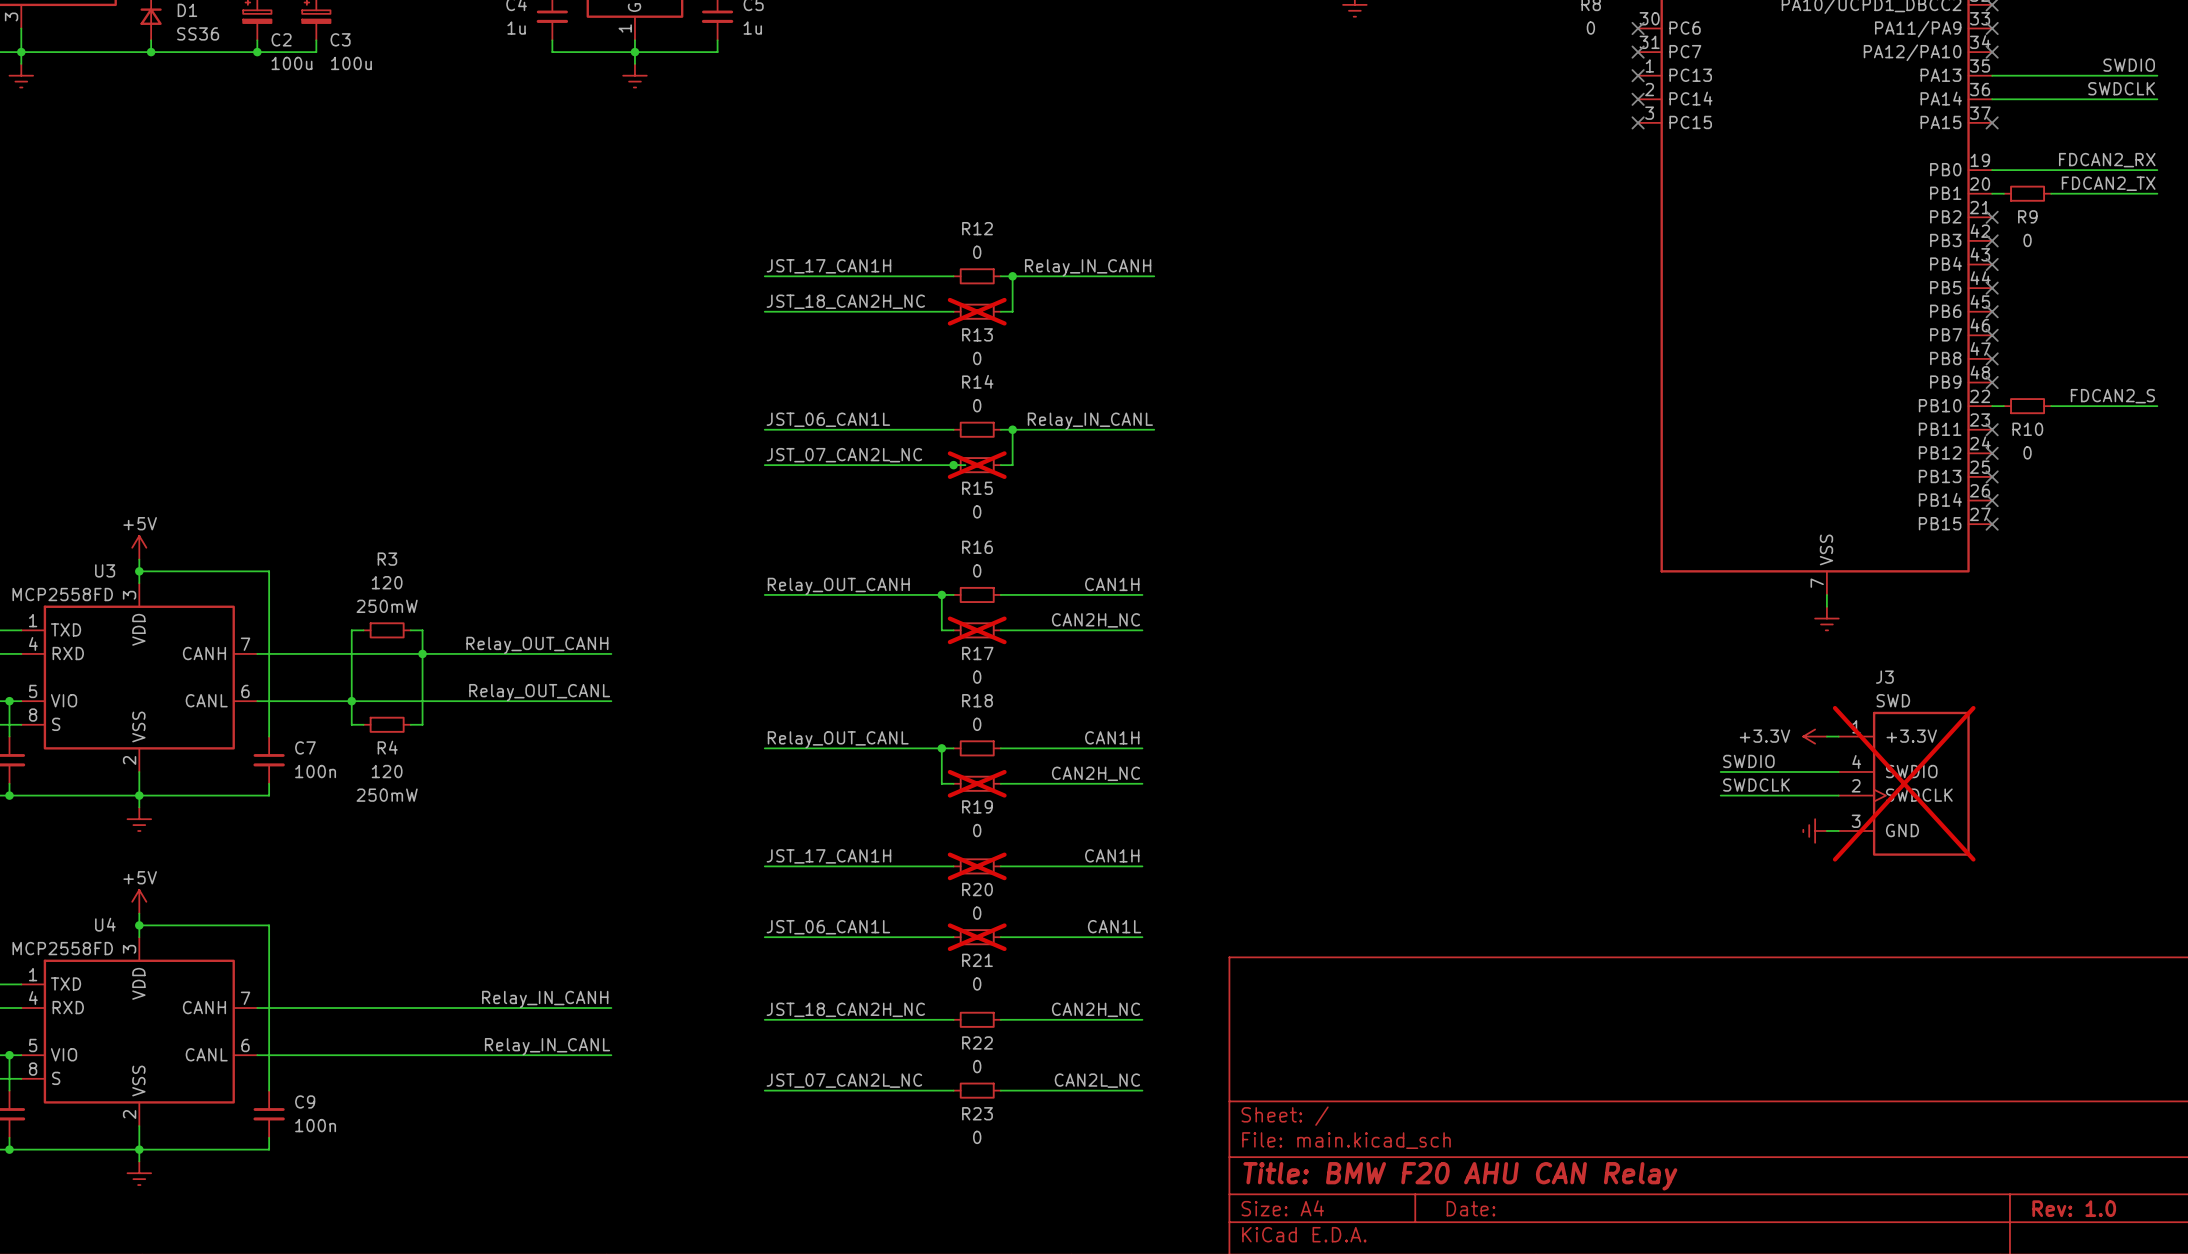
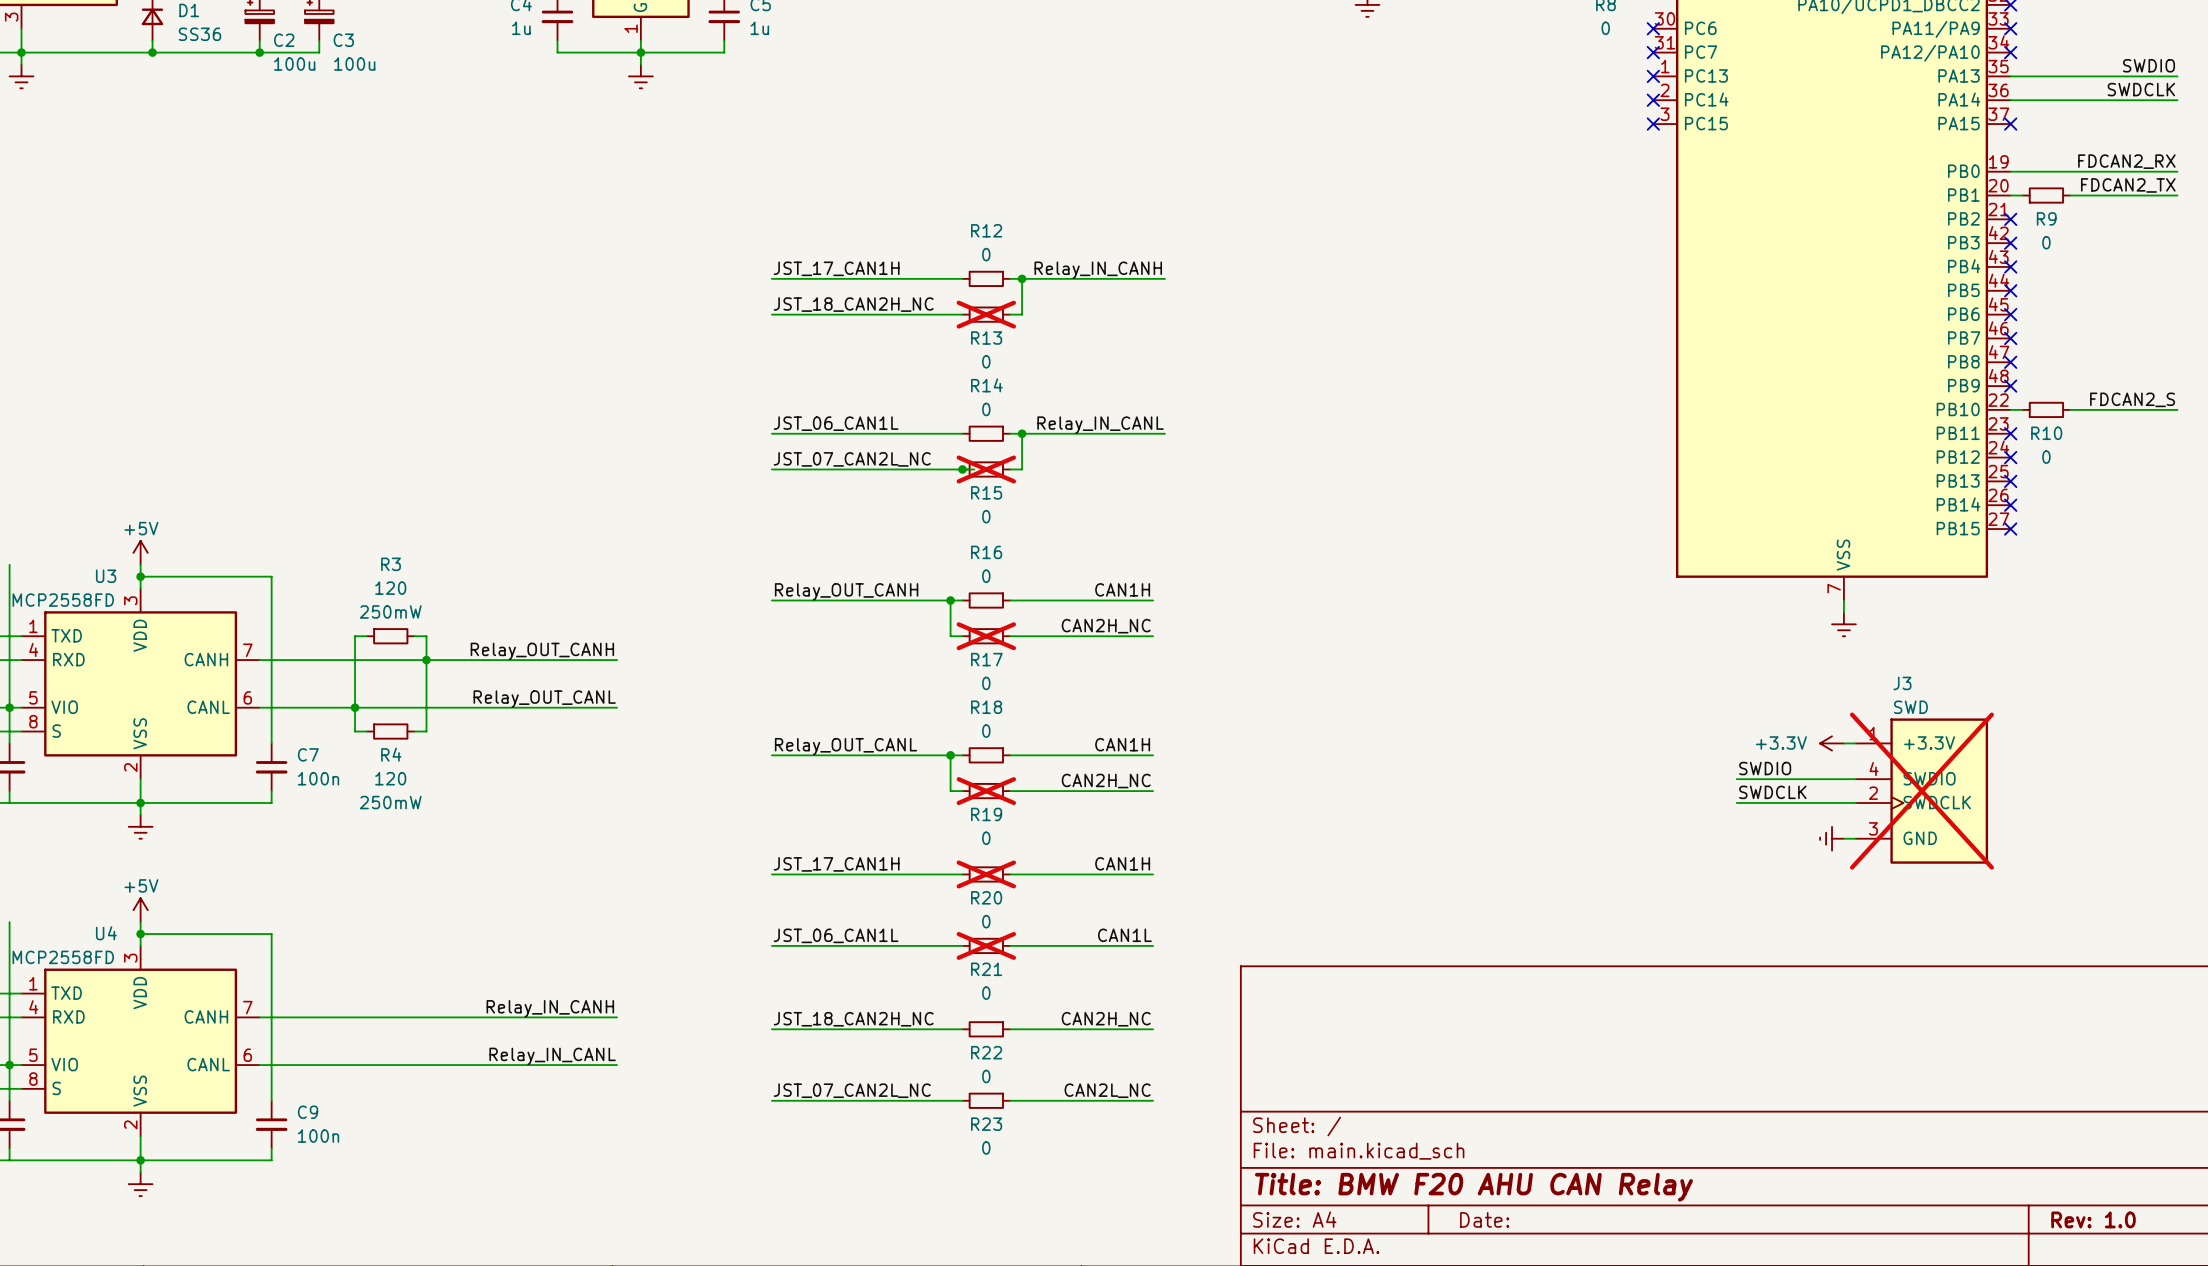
wire: none -> (9, 564) (9, 707)
junction: (9, 795) -> none
wire: none -> (9, 922) (9, 1065)
junction: (9, 1149) -> none

